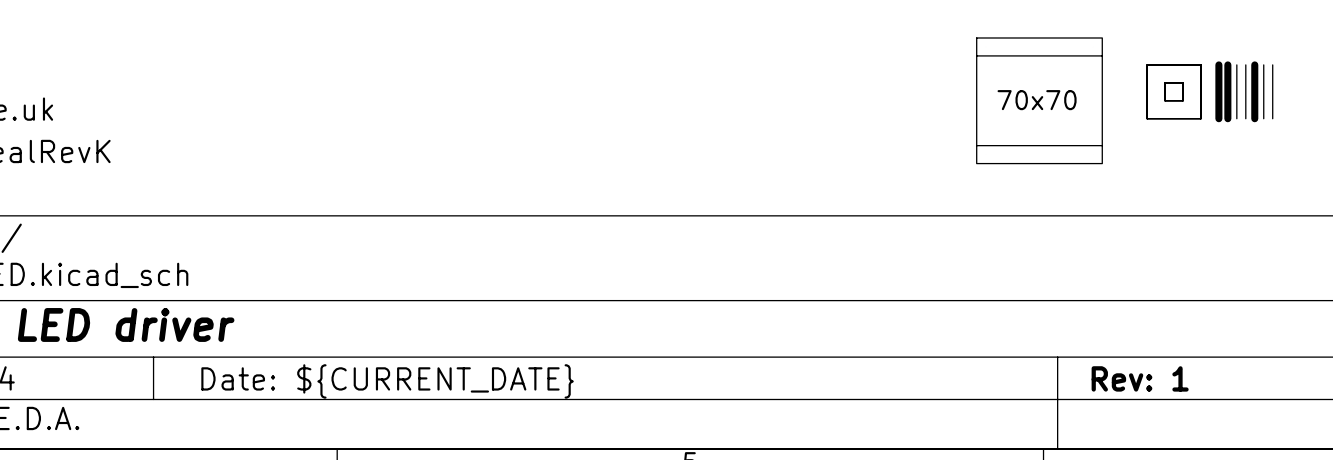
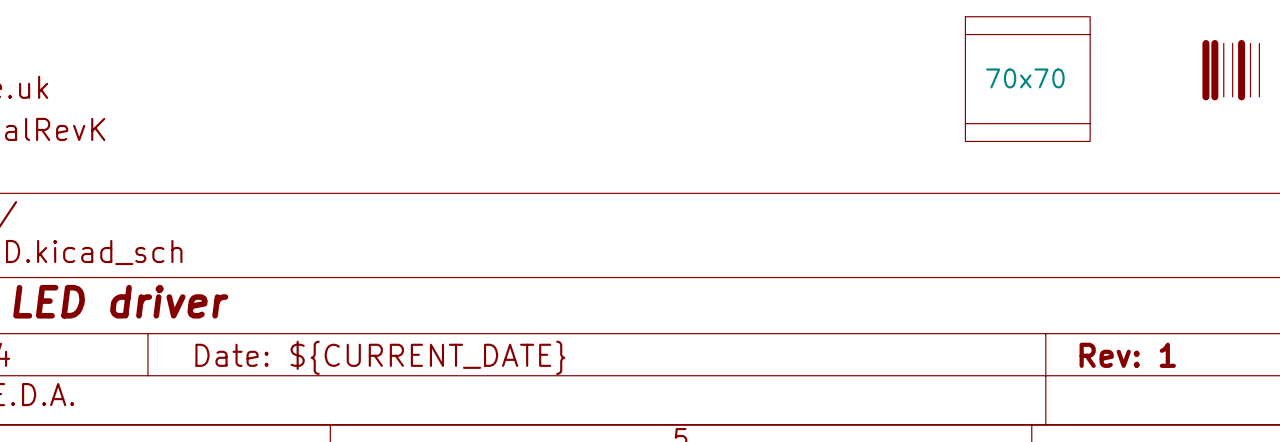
part: (1174, 91) -> none

